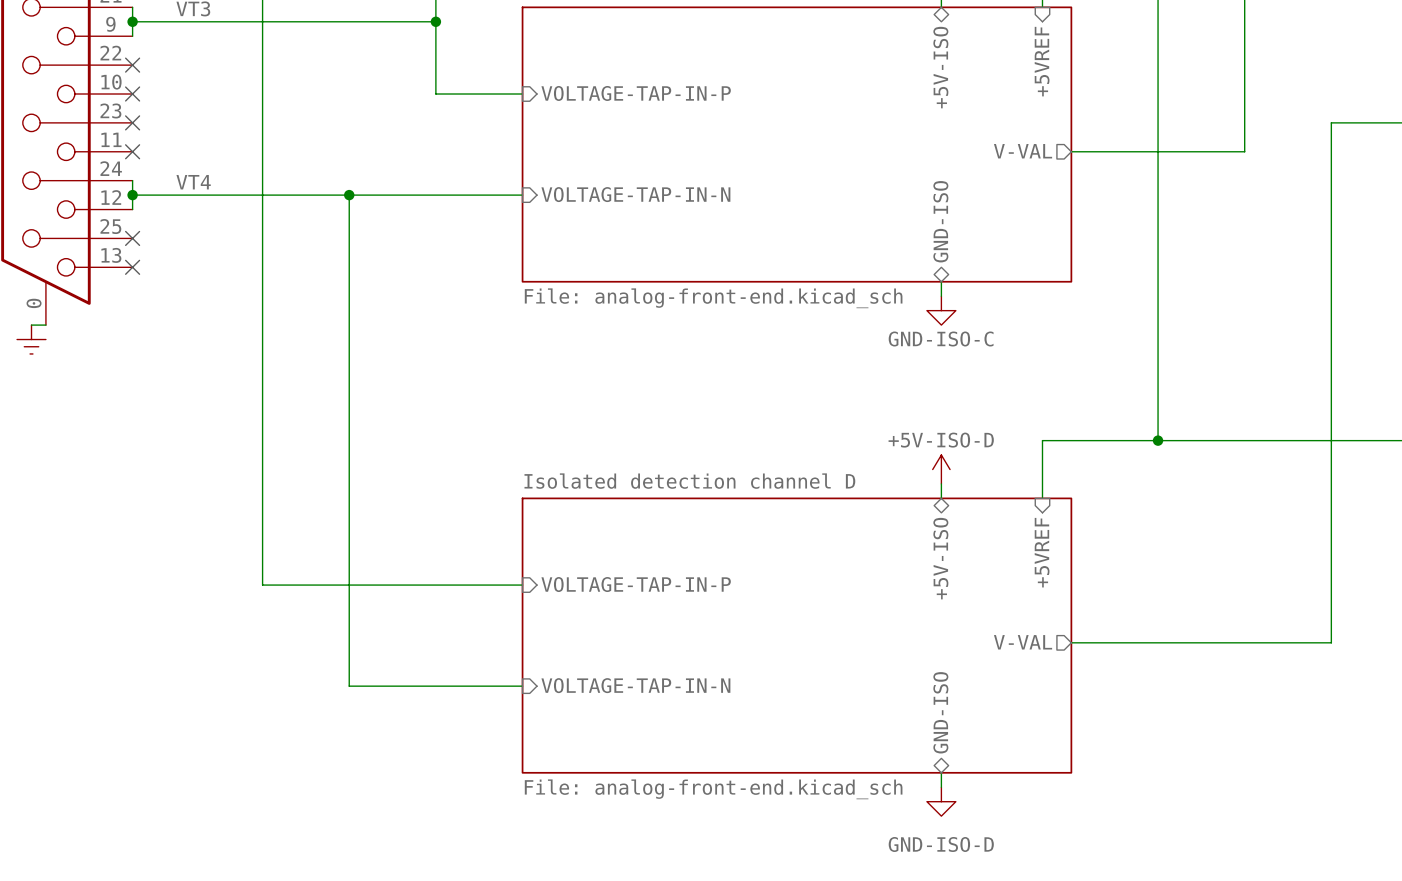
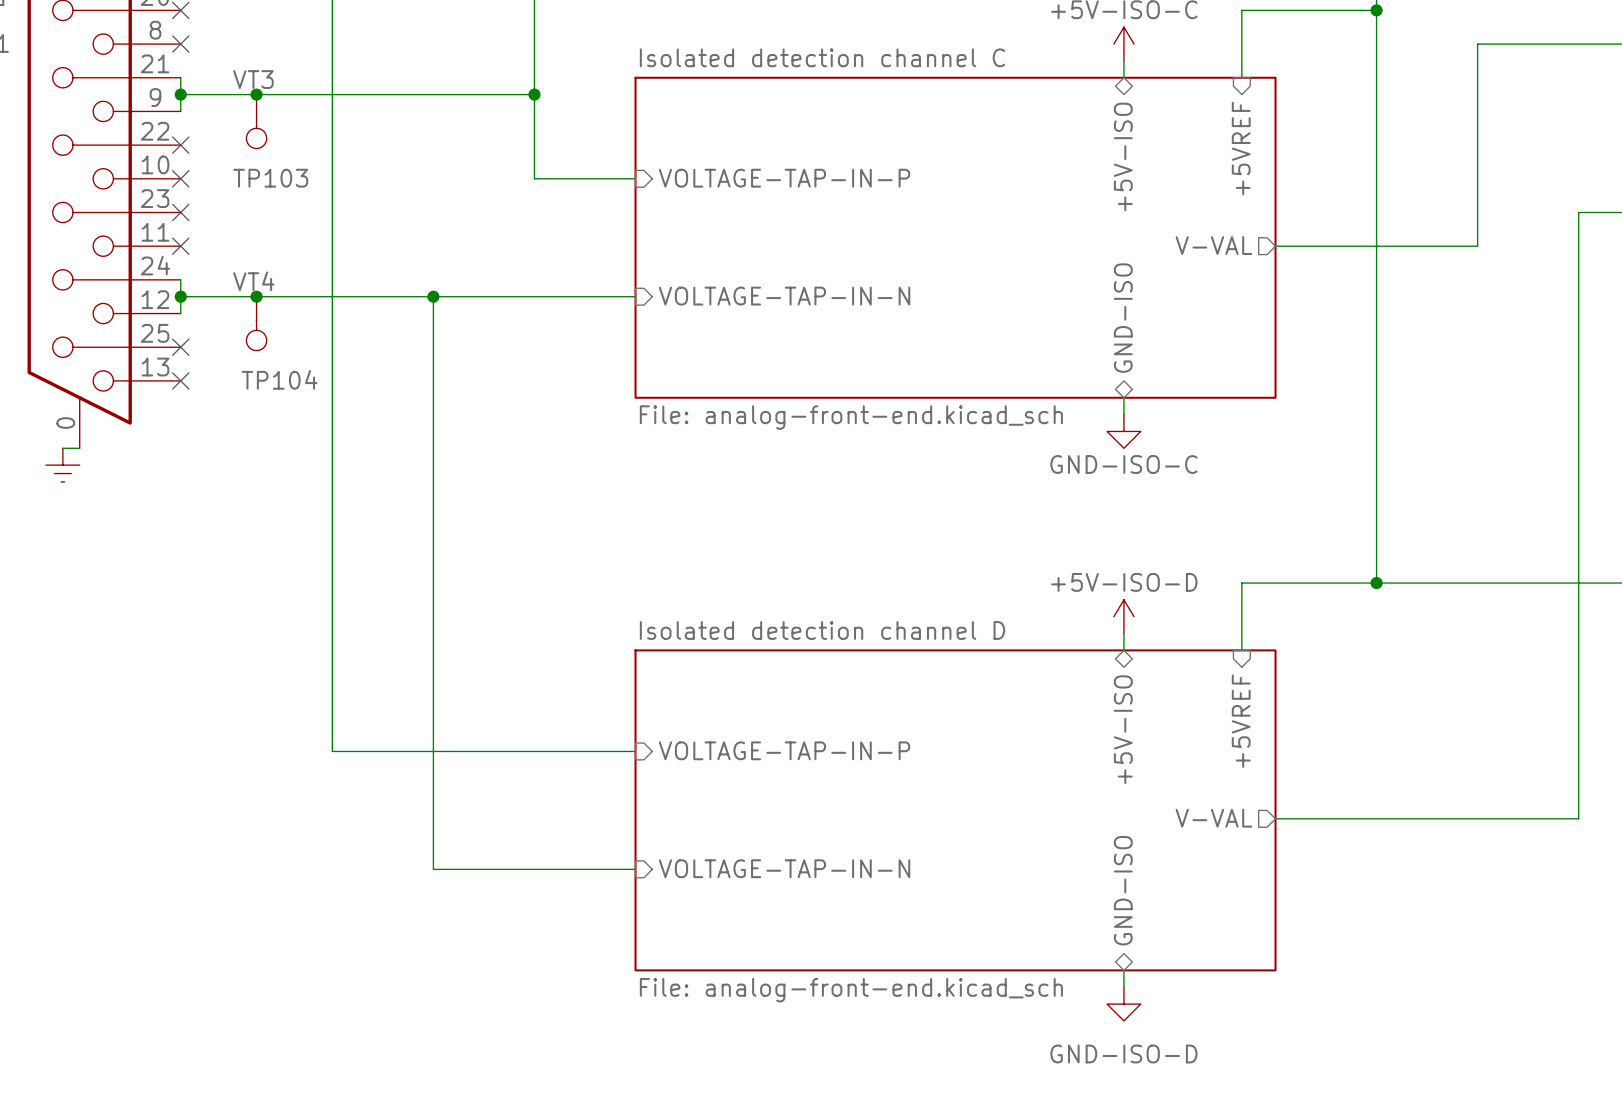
junction: none -> (256, 94)
TP103: none -> (256, 121)
junction: none -> (256, 296)
TP104: none -> (256, 323)

